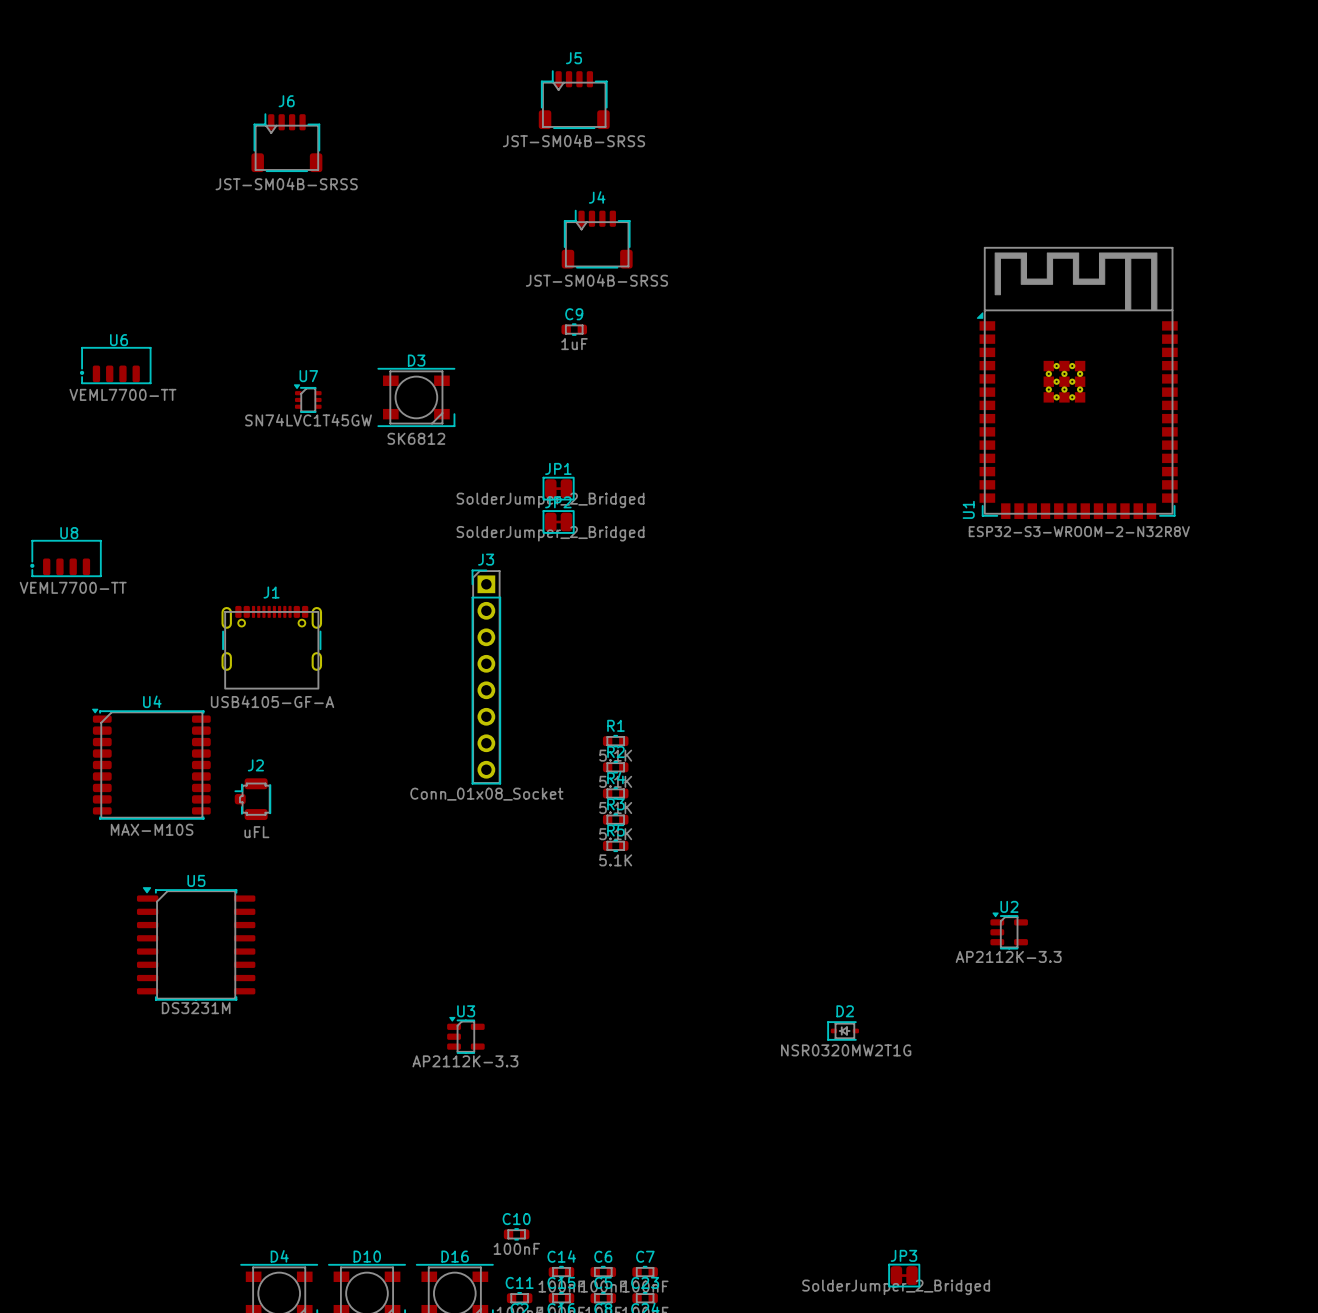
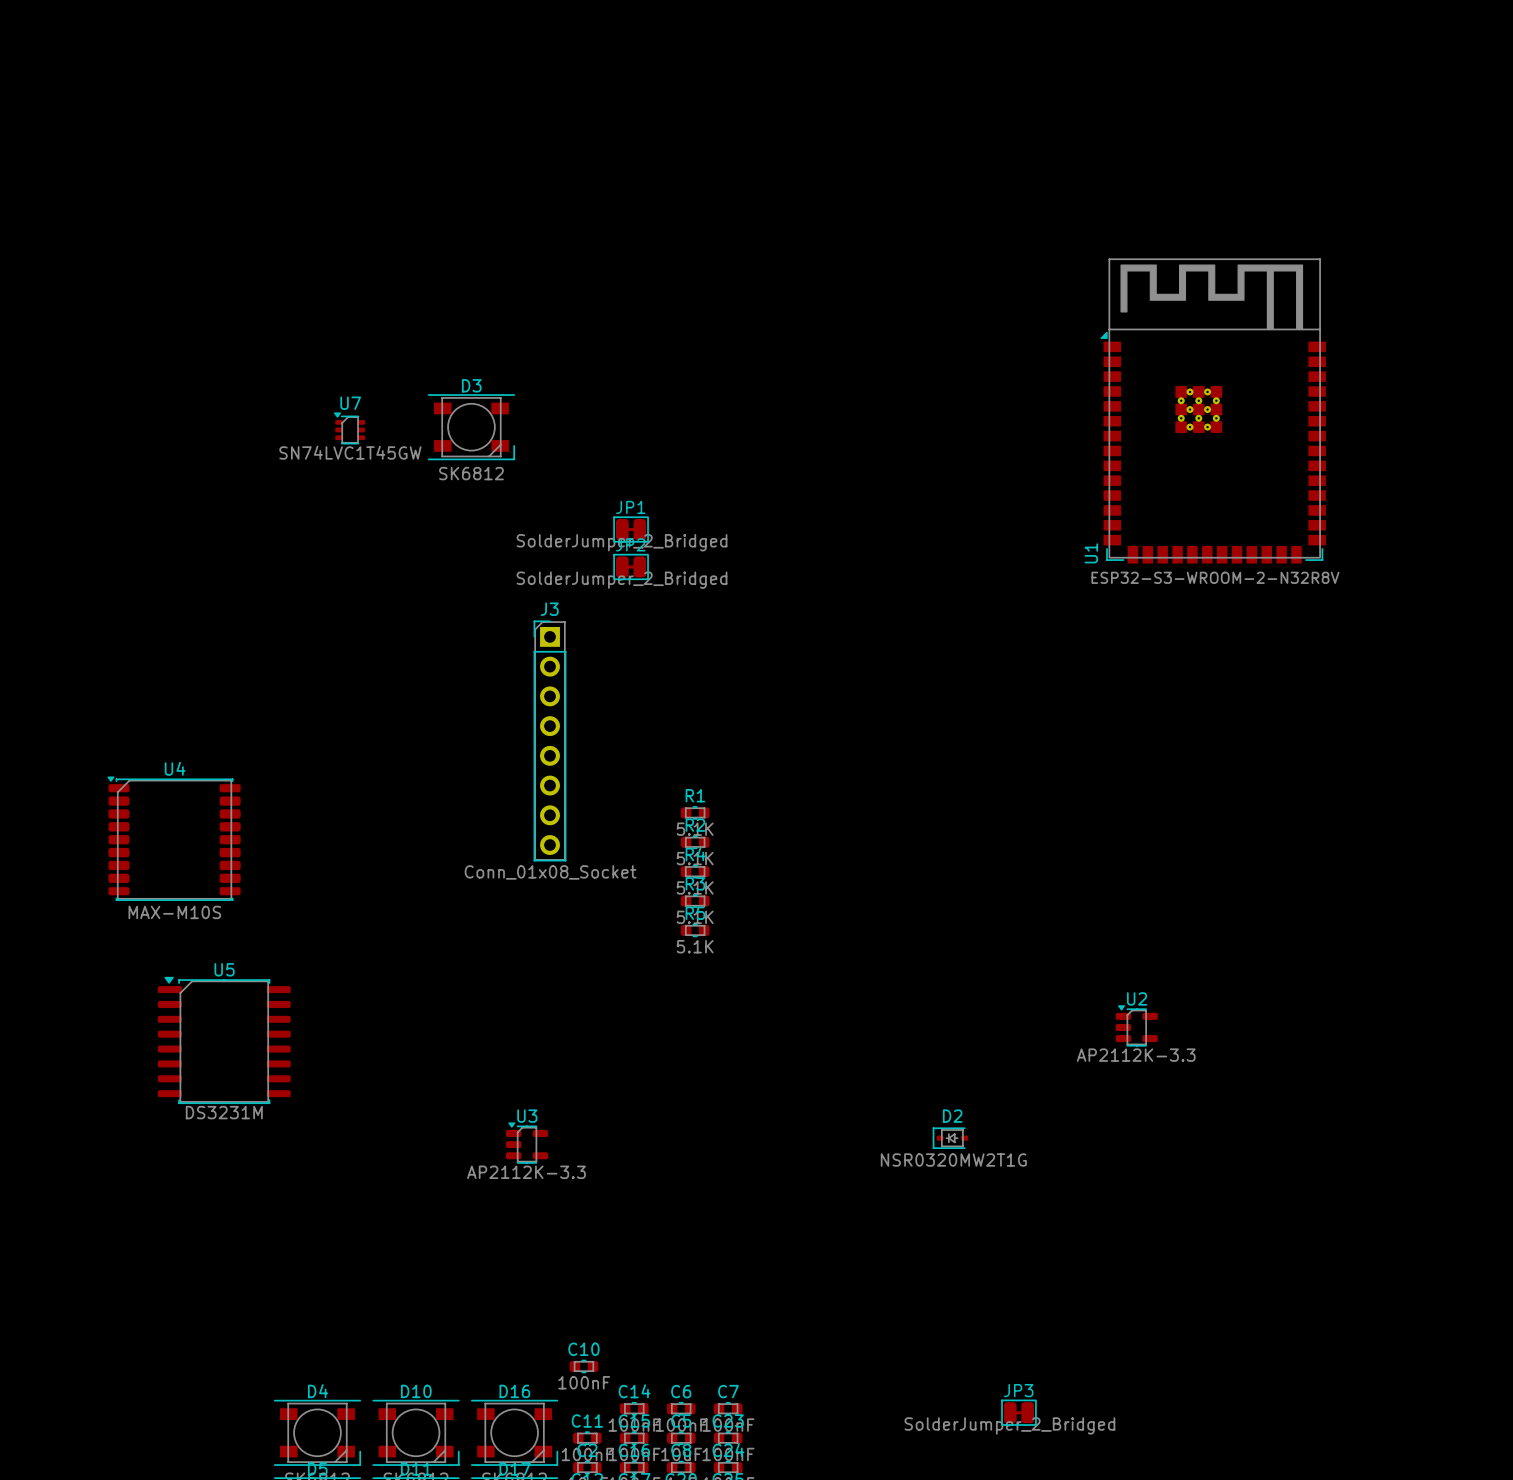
J5: JST-SM04B-SRSS (574, 99) -> none
J6: JST-SM04B-SRSS (286, 142) -> none
J4: JST-SM04B-SRSS (597, 239) -> none
C9: 1uF (574, 329) -> none
U6: VEML7700-TT (115, 365) -> none
U8: VEML7700-TT (65, 558) -> none
J1: USB4105-GF-A (271, 647) -> none
J2: uFL (252, 799) -> none

